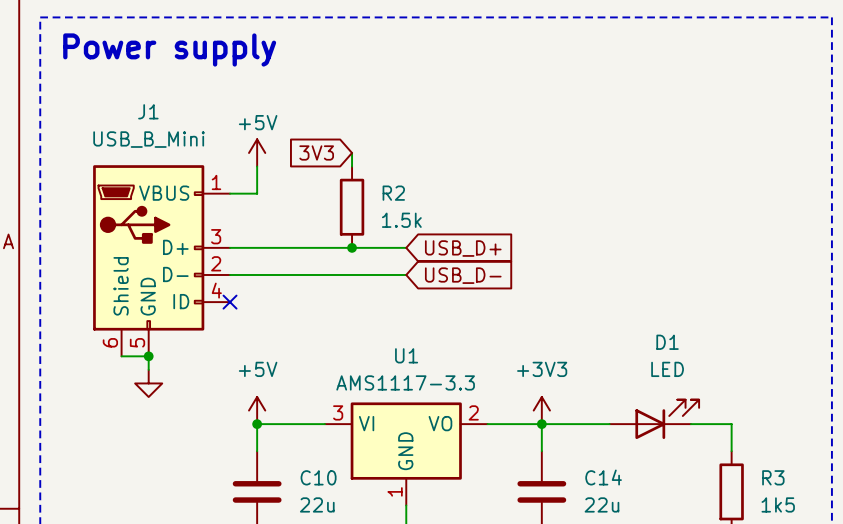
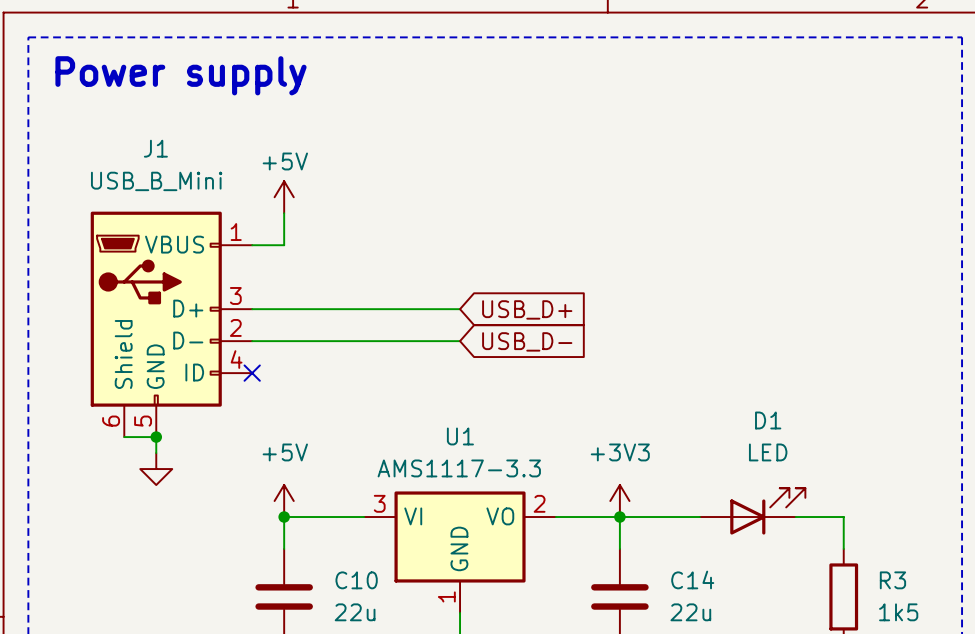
global label: 3V3 (316, 152) -> none
wire: (352, 152) (352, 166) -> none
R2: 1.5k (352, 207) -> none
junction: (352, 247) -> none

